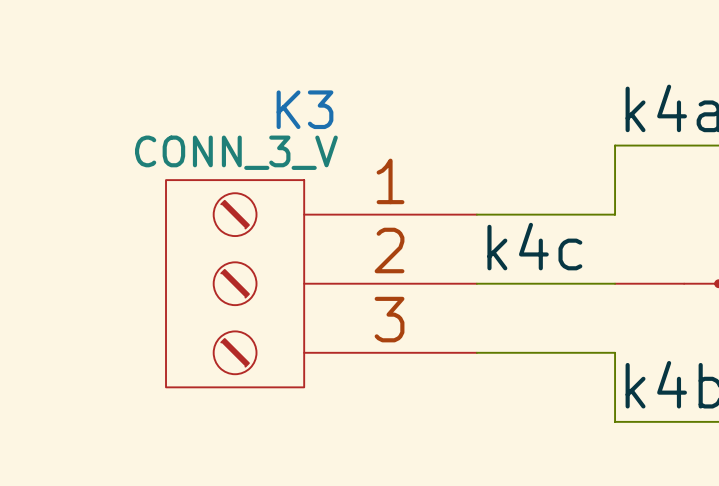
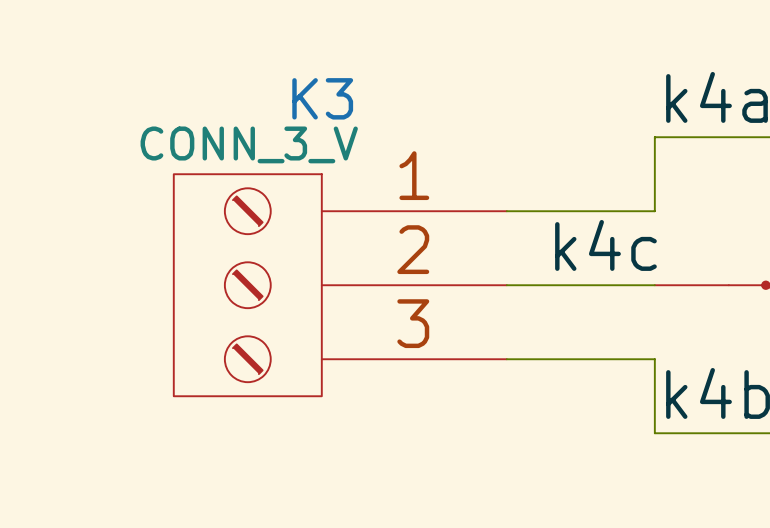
label position: k4c (534, 246) -> k4c (605, 245)

